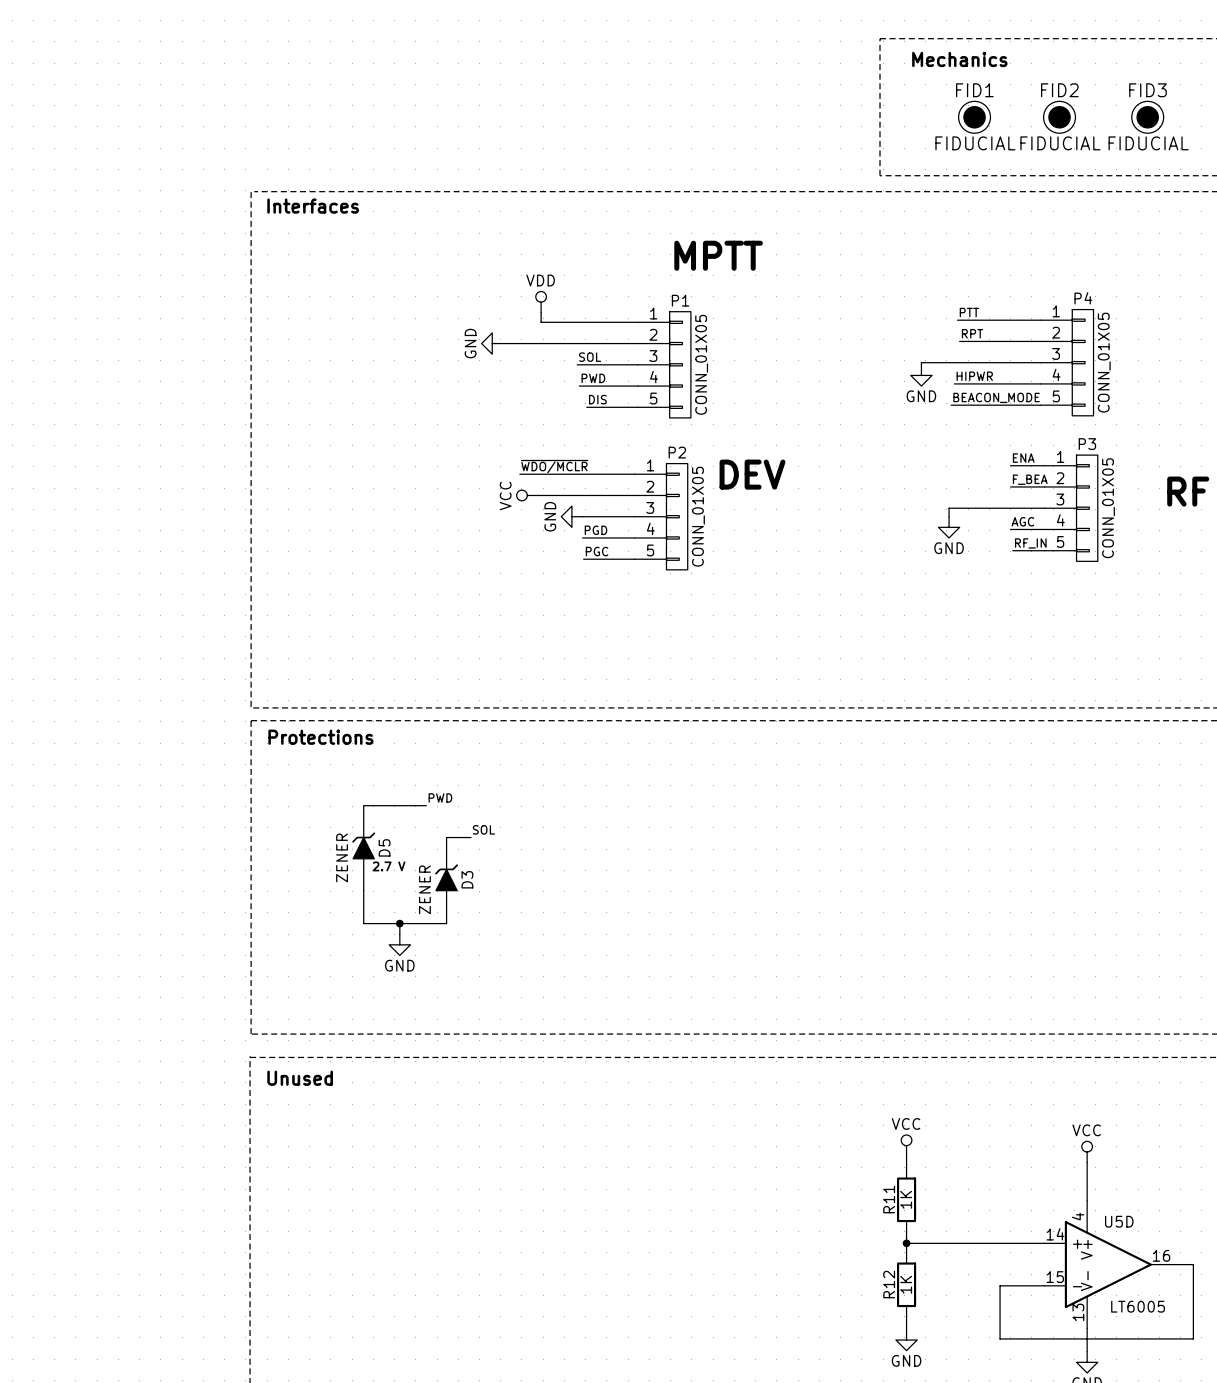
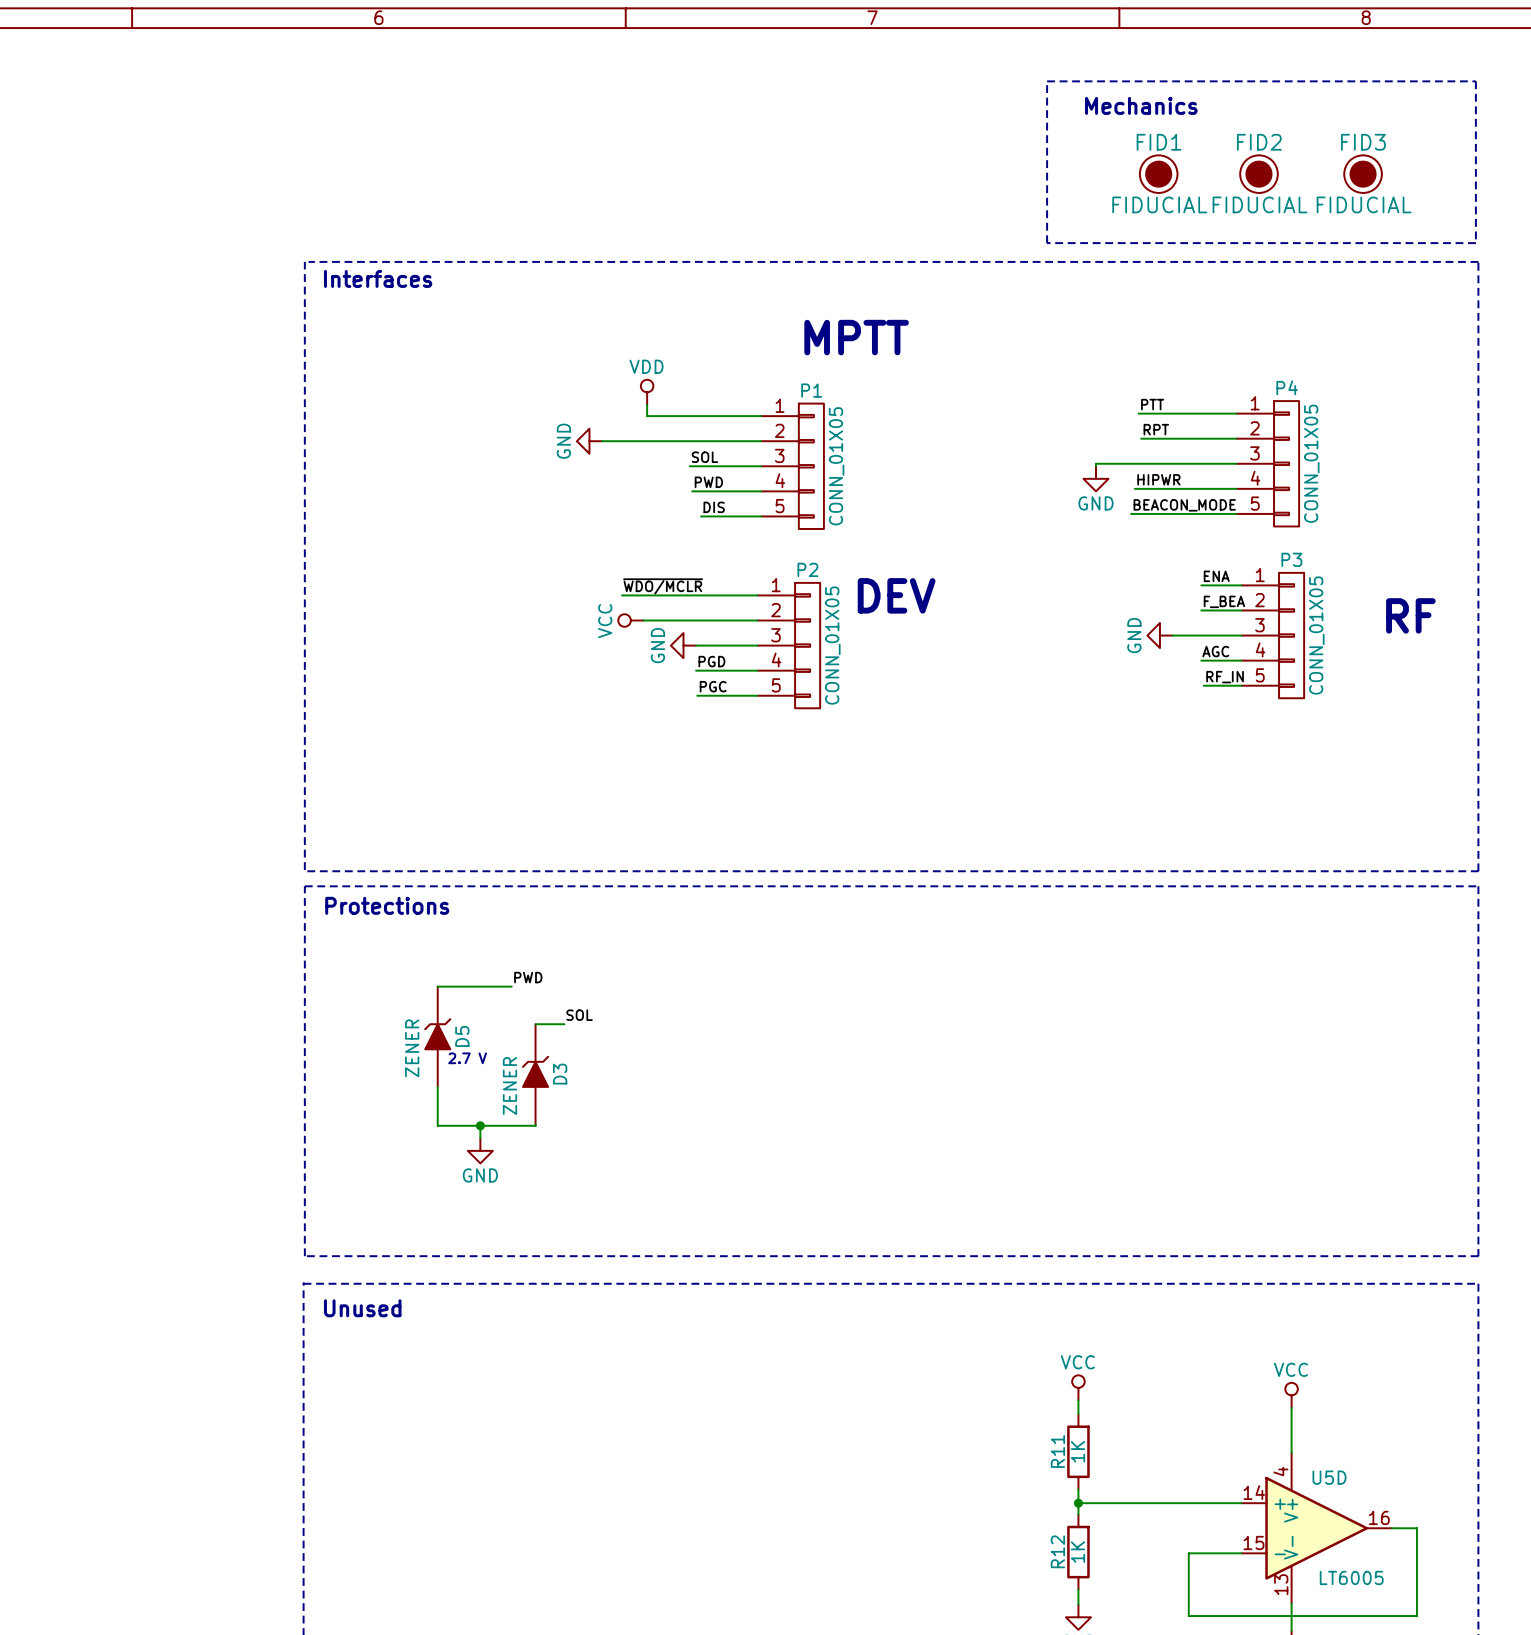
wire: (986, 508) (949, 508) (949, 516) -> none
power symbol rotation: 0° (949, 527) -> 90° clockwise (1159, 635)
power symbol position: GND (949, 527) -> GND (1159, 635)

